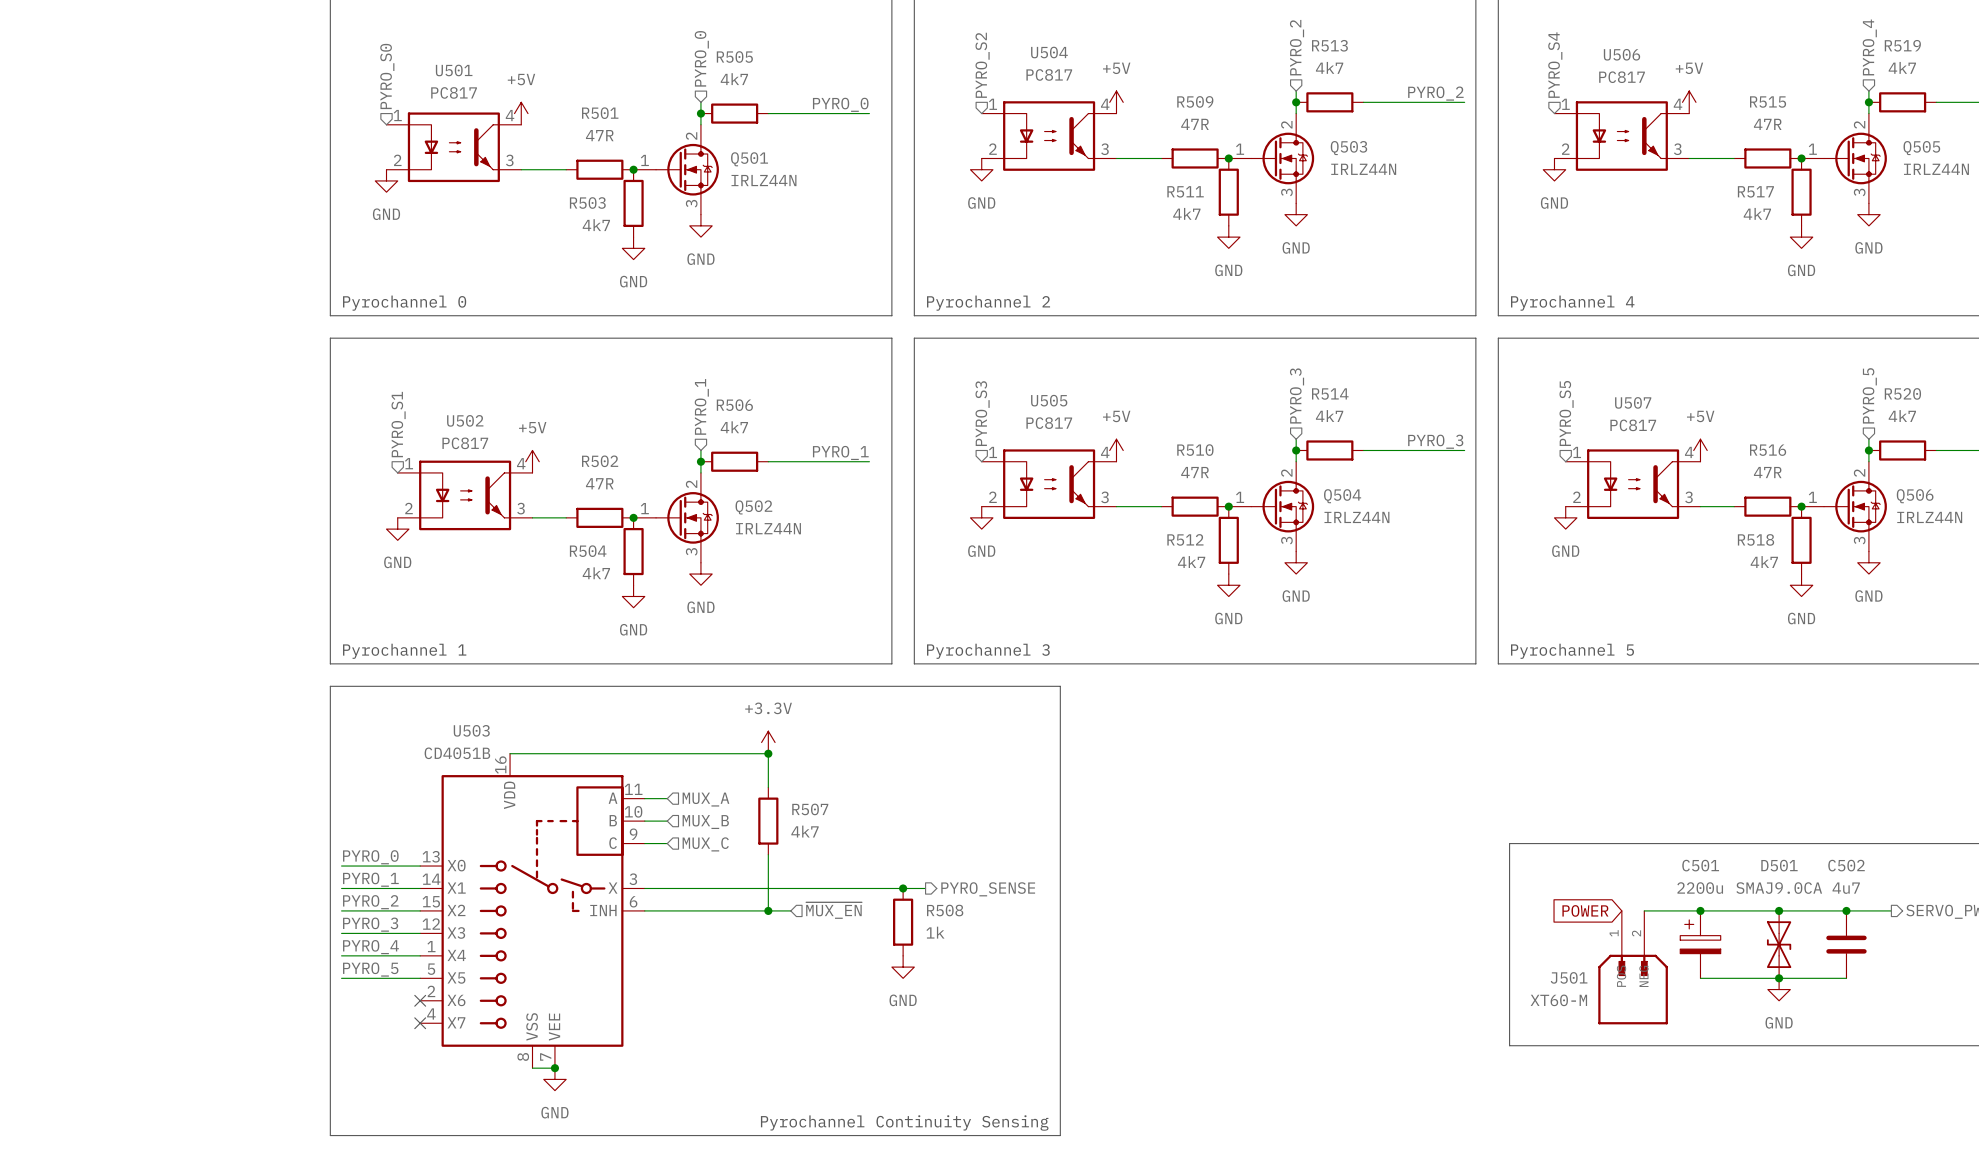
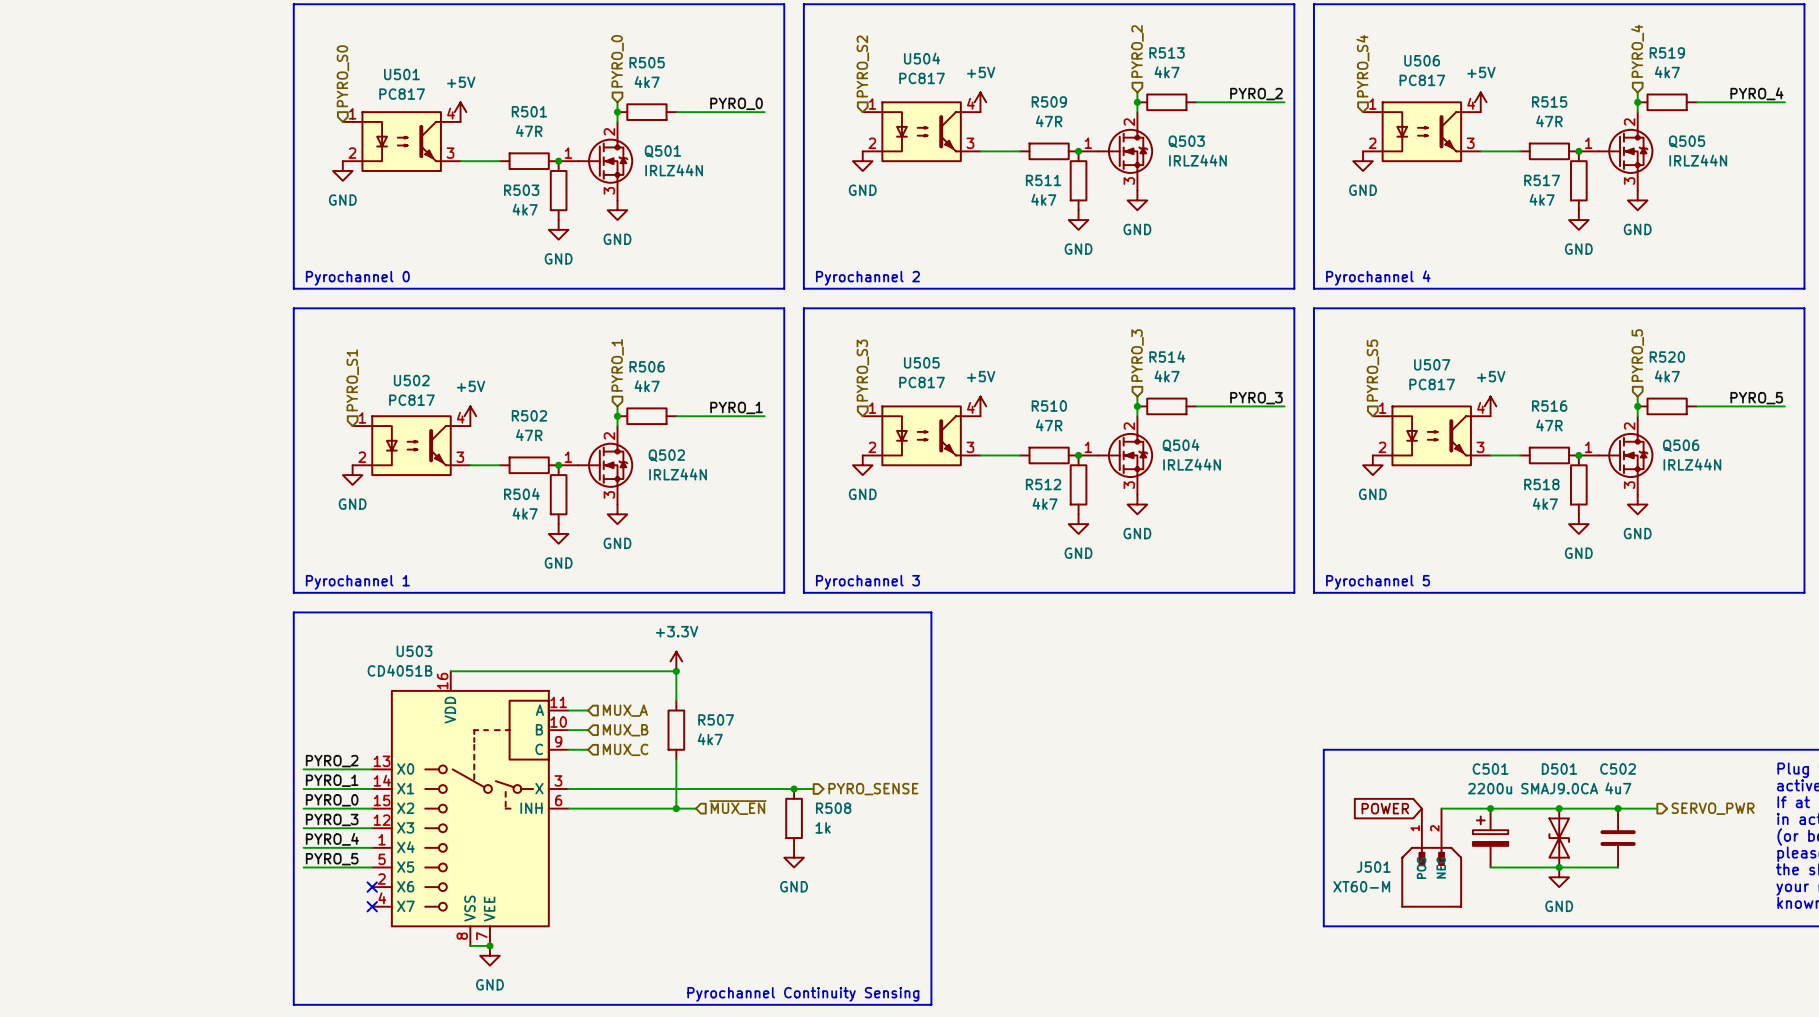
label: PYRO_0 (370, 857) -> PYRO_2 (332, 761)
label: PYRO_2 (370, 902) -> PYRO_0 (332, 800)

